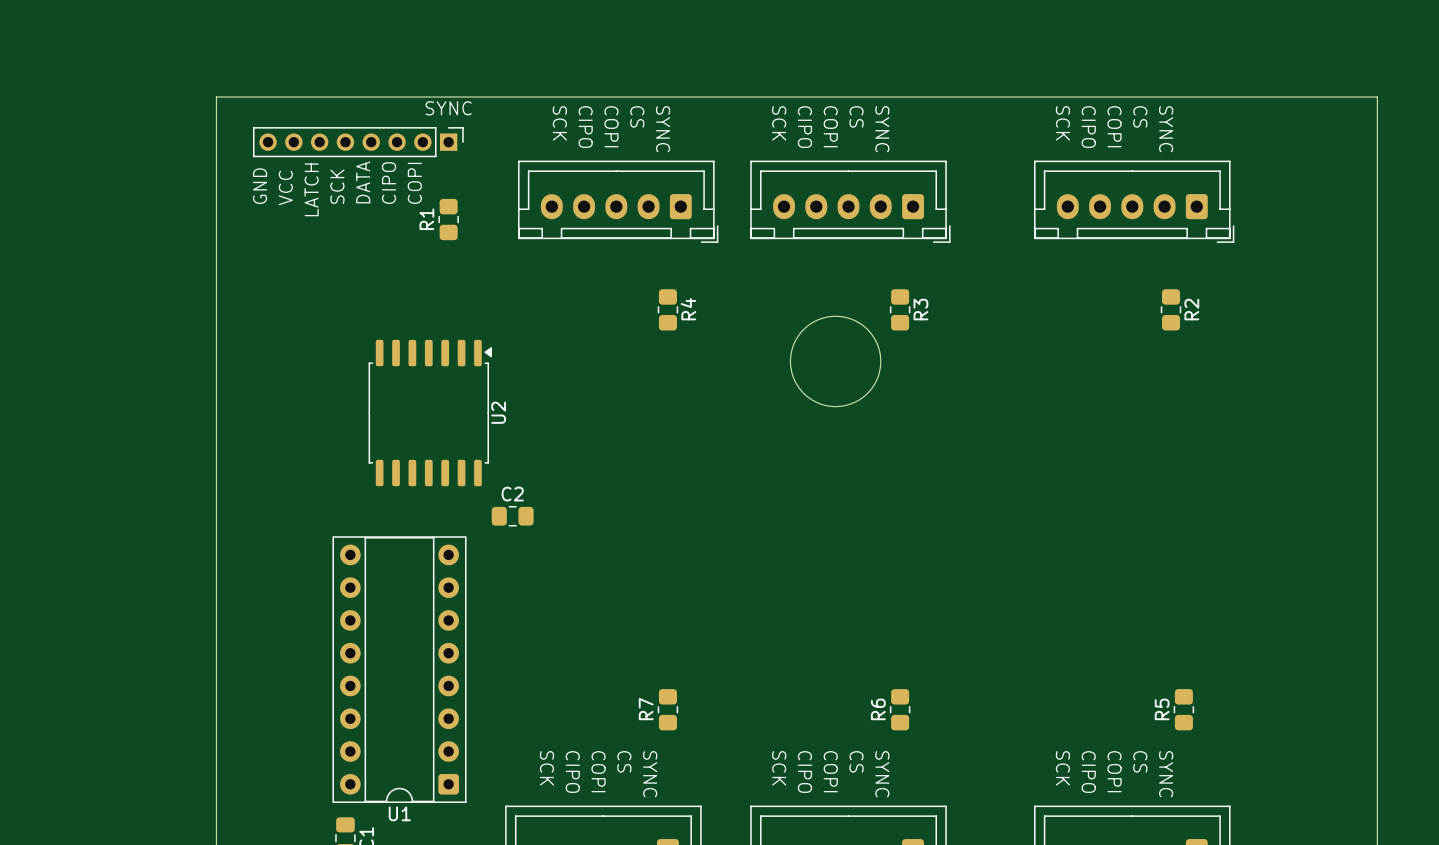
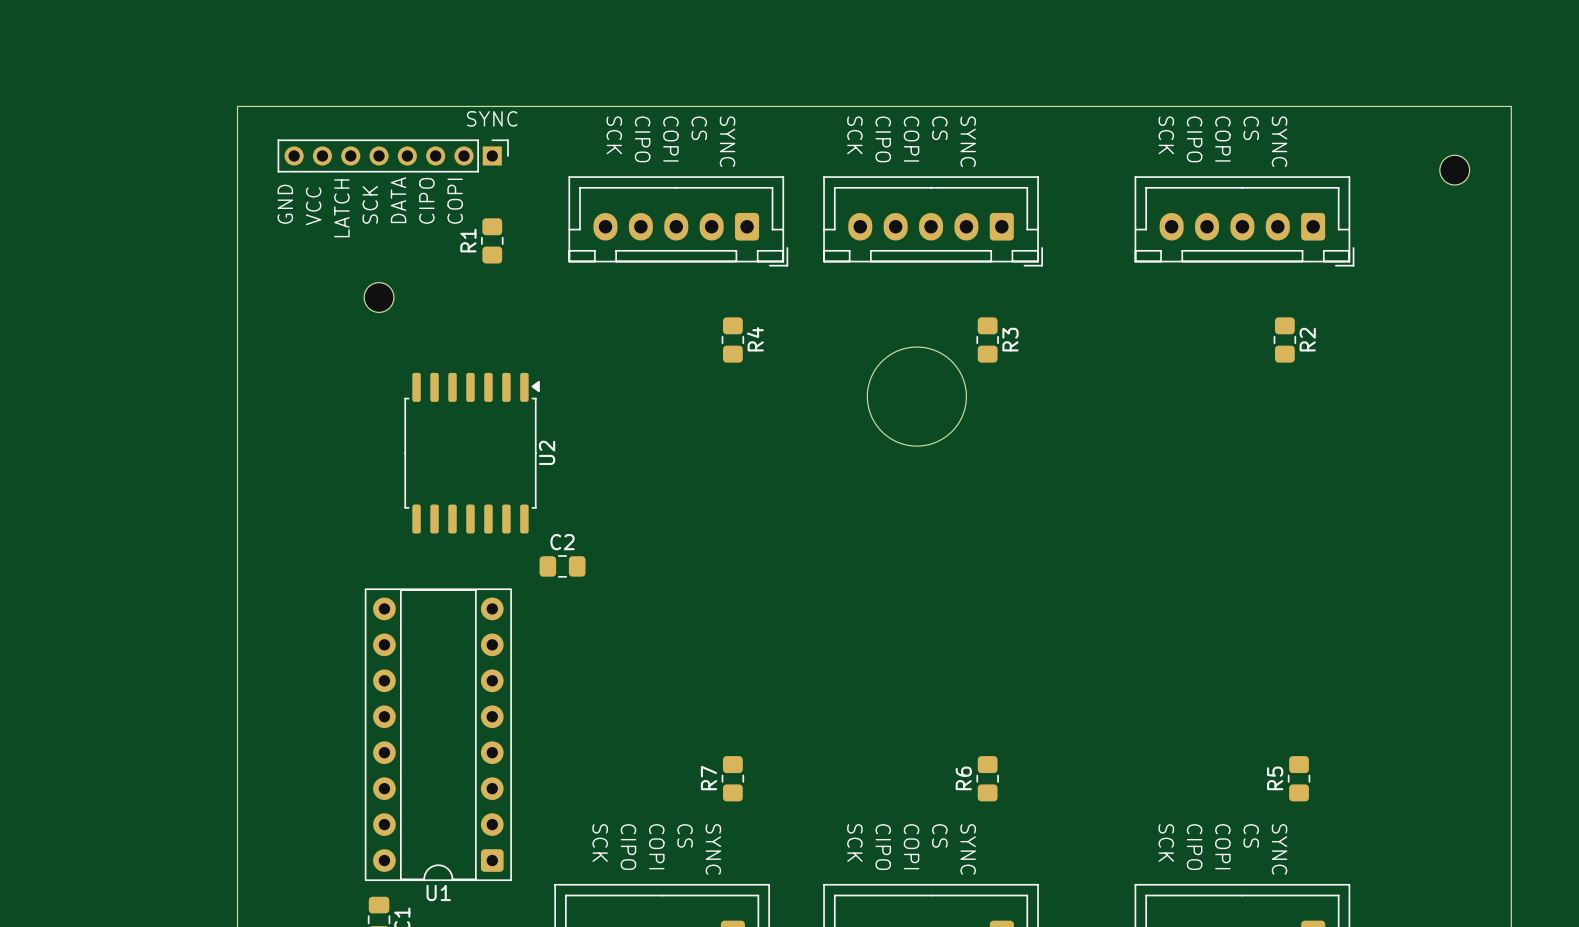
part: none -> (1454, 170)
part: none -> (379, 297)

